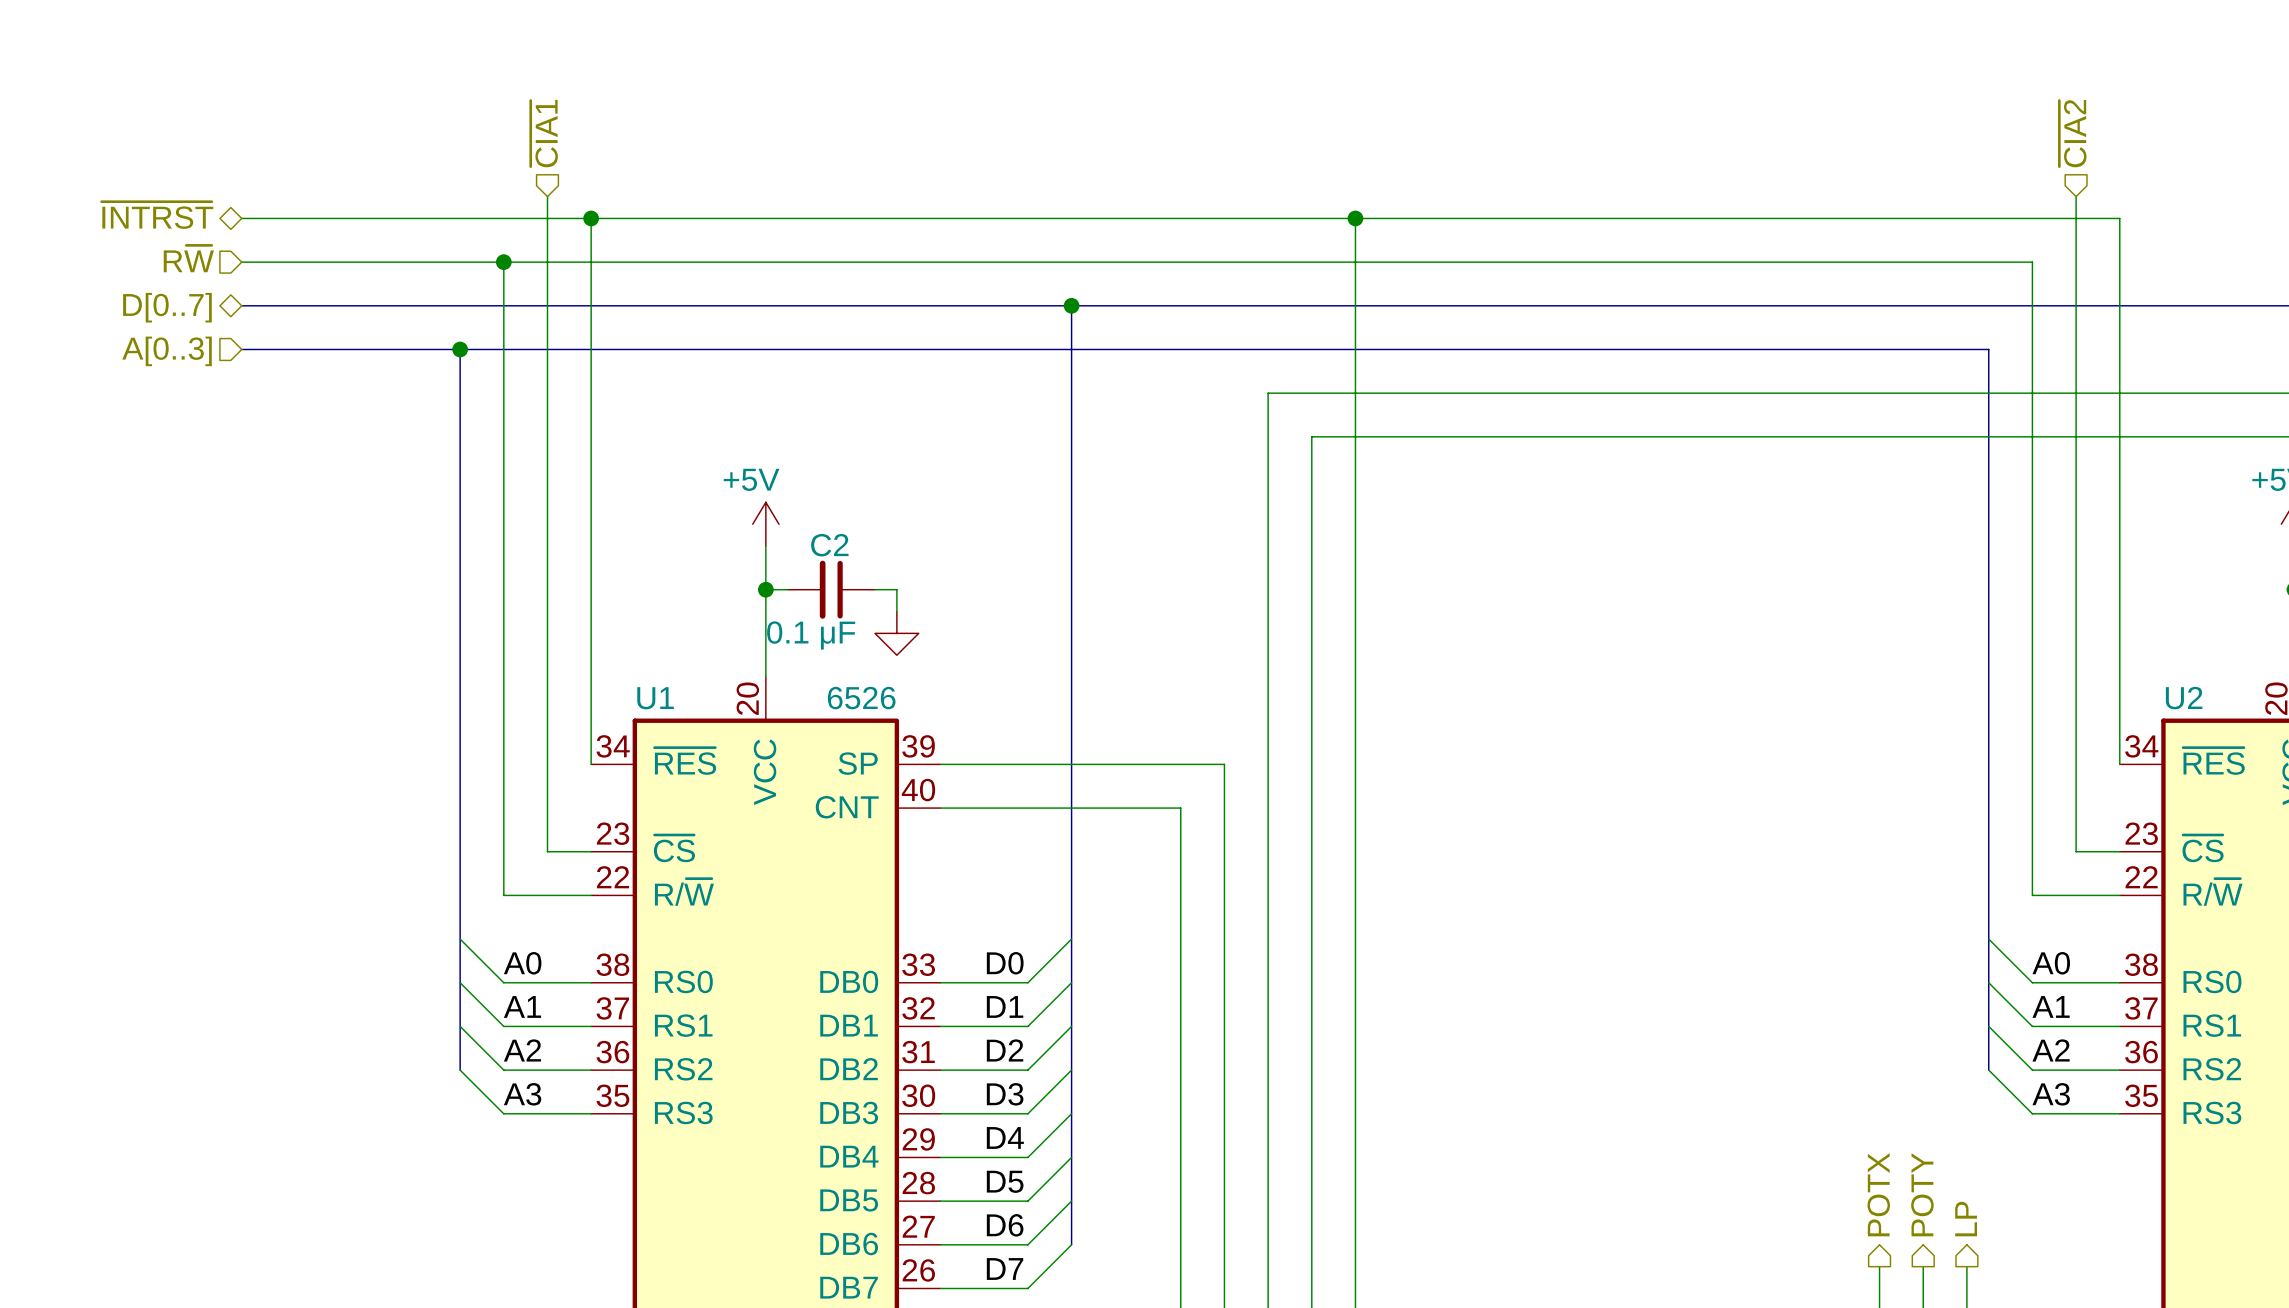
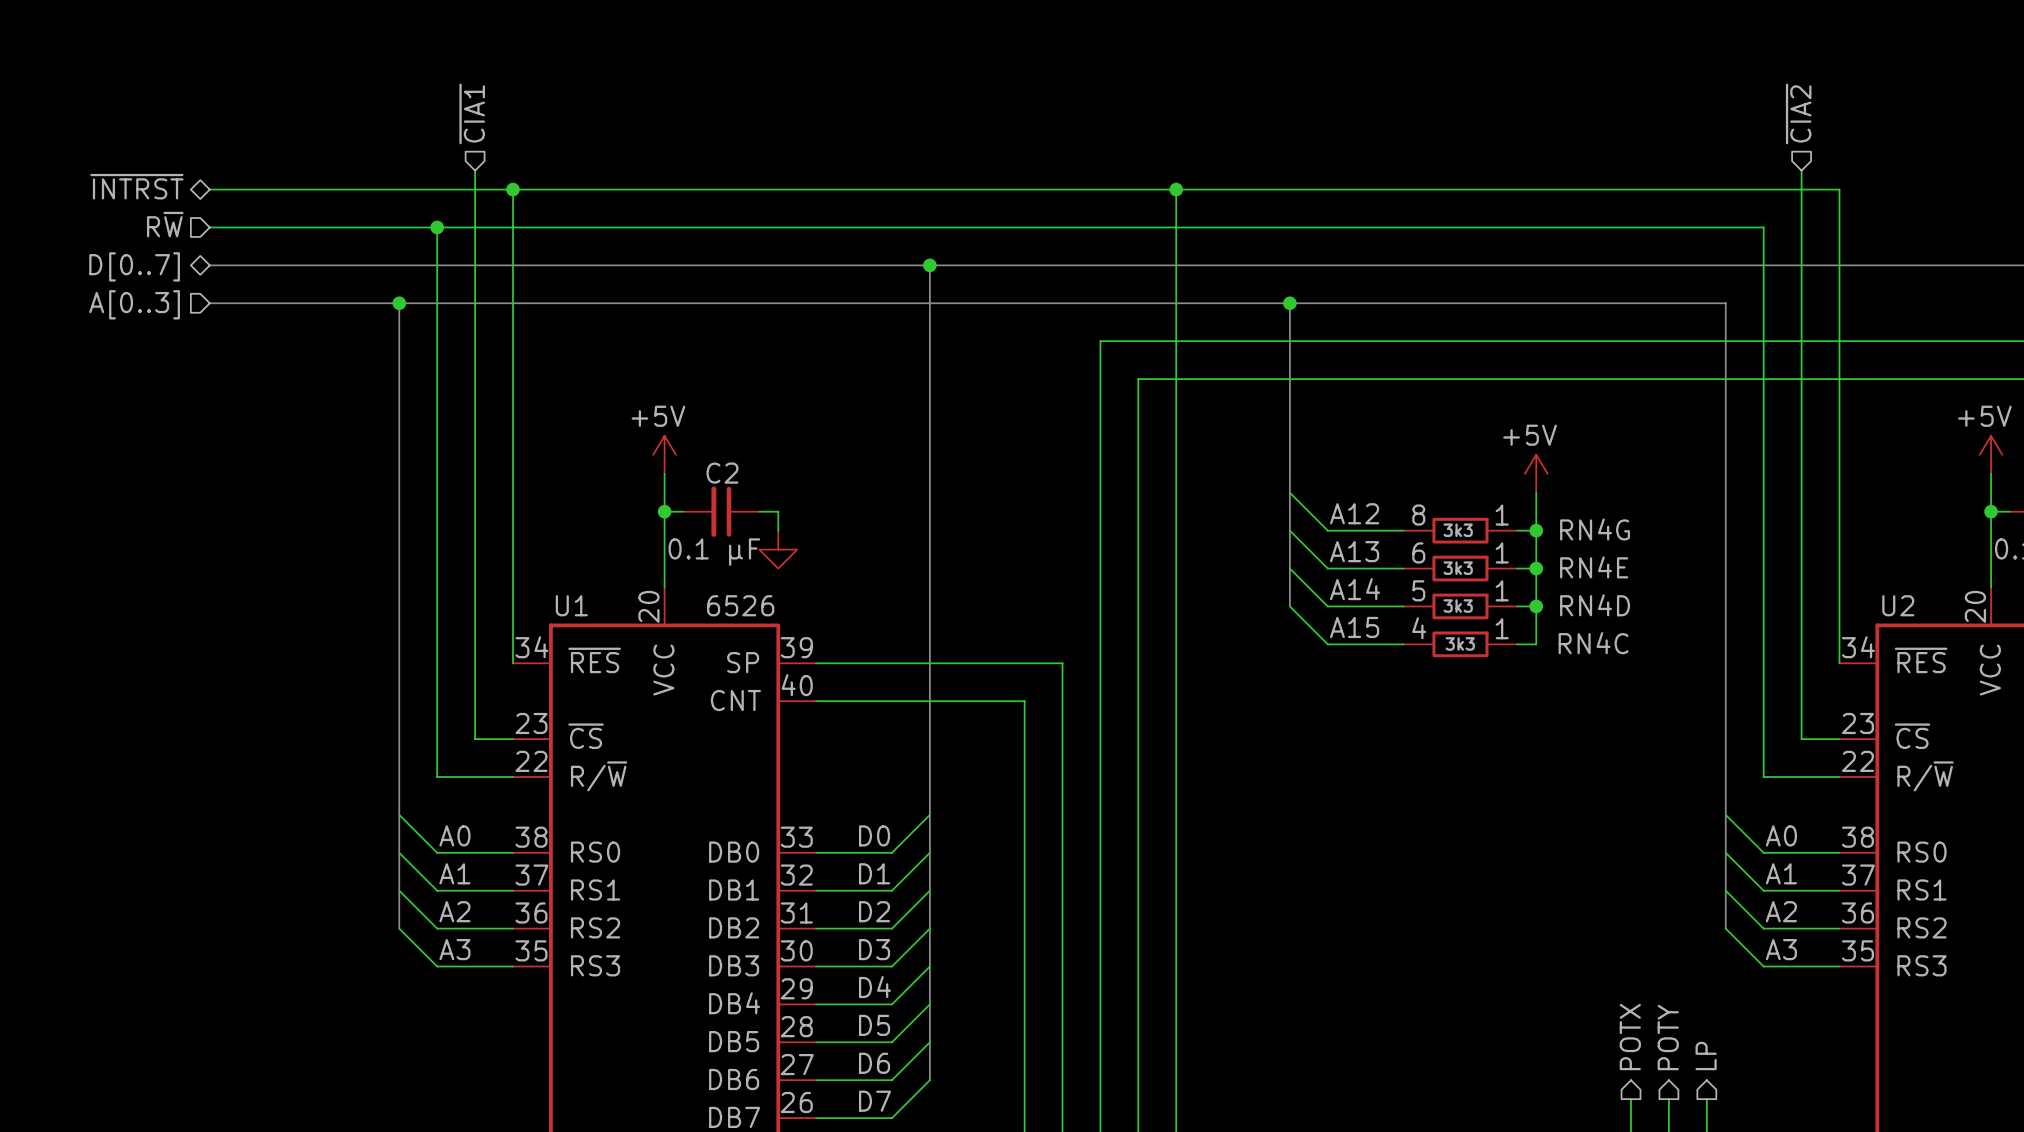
bus: none -> (1289, 303) (1289, 606)
junction: none -> (1289, 303)
power symbol: none -> +5V (1536, 473)
wire: none -> (1289, 492) (1327, 530) (1403, 530)
wire: none -> (1536, 492) (1536, 644) (1517, 644)
label: none -> A12 (1354, 513)
wire: none -> (1289, 530) (1327, 568) (1403, 568)
RN4G: none -> 3k3 (1460, 530)
wire: none -> (1517, 530) (1536, 530)
junction: none -> (1536, 530)
label: none -> A13 (1354, 551)
wire: none -> (1289, 568) (1327, 606) (1403, 606)
RN4E: none -> 3k3 (1460, 568)
wire: none -> (1517, 568) (1536, 568)
junction: none -> (1536, 568)
label: none -> A14 (1355, 589)
wire: none -> (1289, 606) (1327, 644) (1403, 644)
RN4D: none -> 3k3 (1460, 606)
wire: none -> (1517, 606) (1536, 606)
junction: none -> (1536, 606)
label: none -> A15 (1354, 627)
RN4C: none -> 3k3 (1460, 644)

